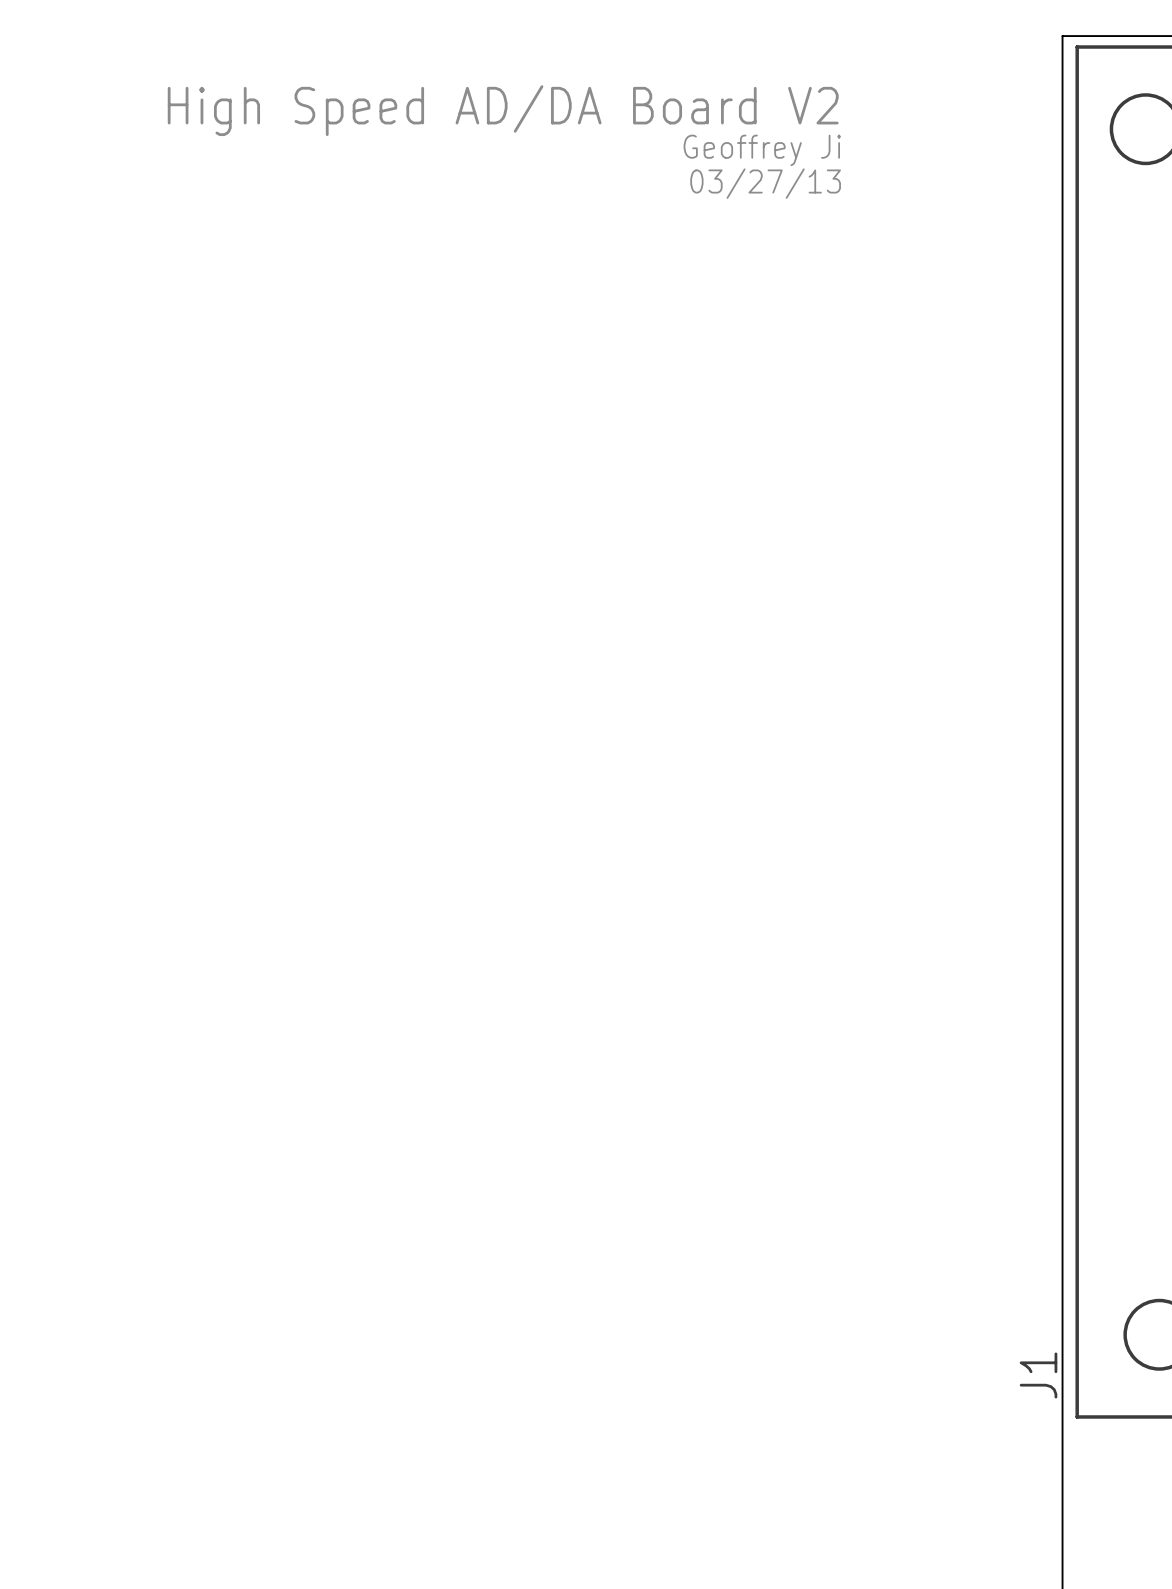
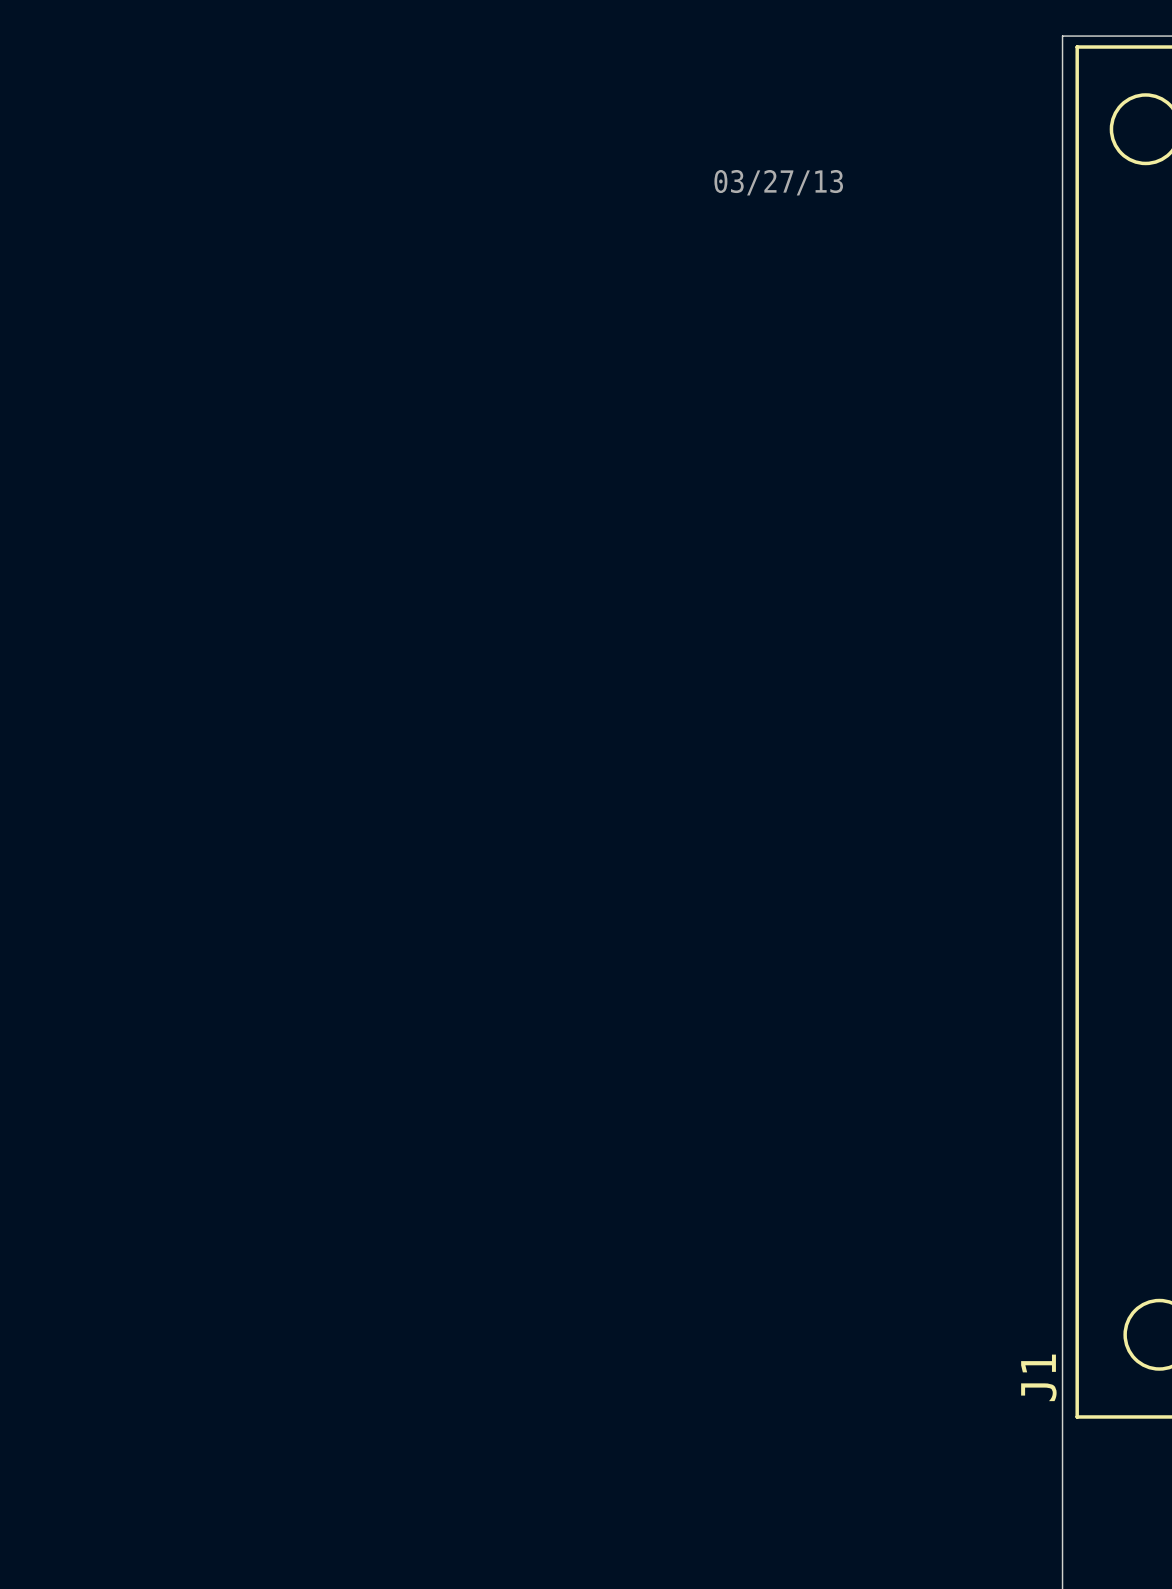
text: High Speed AD/DA Board V2 (503, 110) -> none
text: Geoffrey Ji (762, 150) -> none

